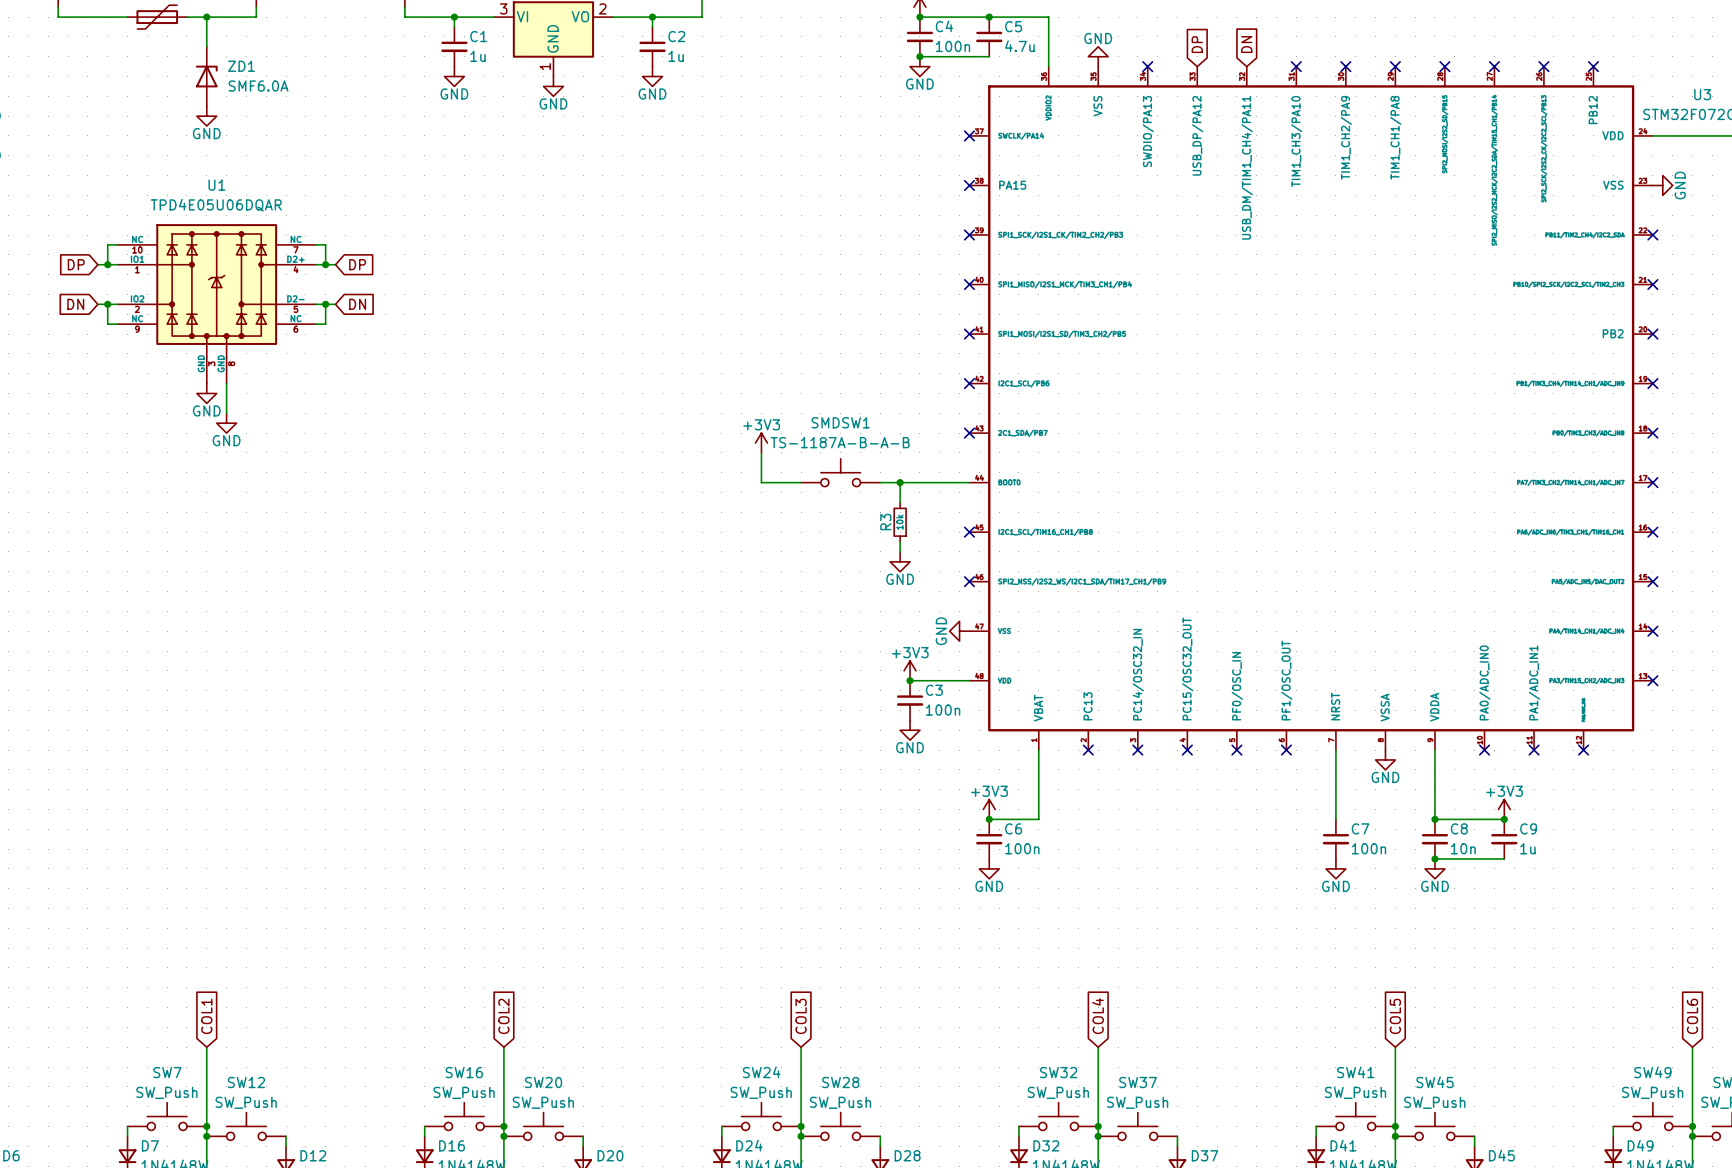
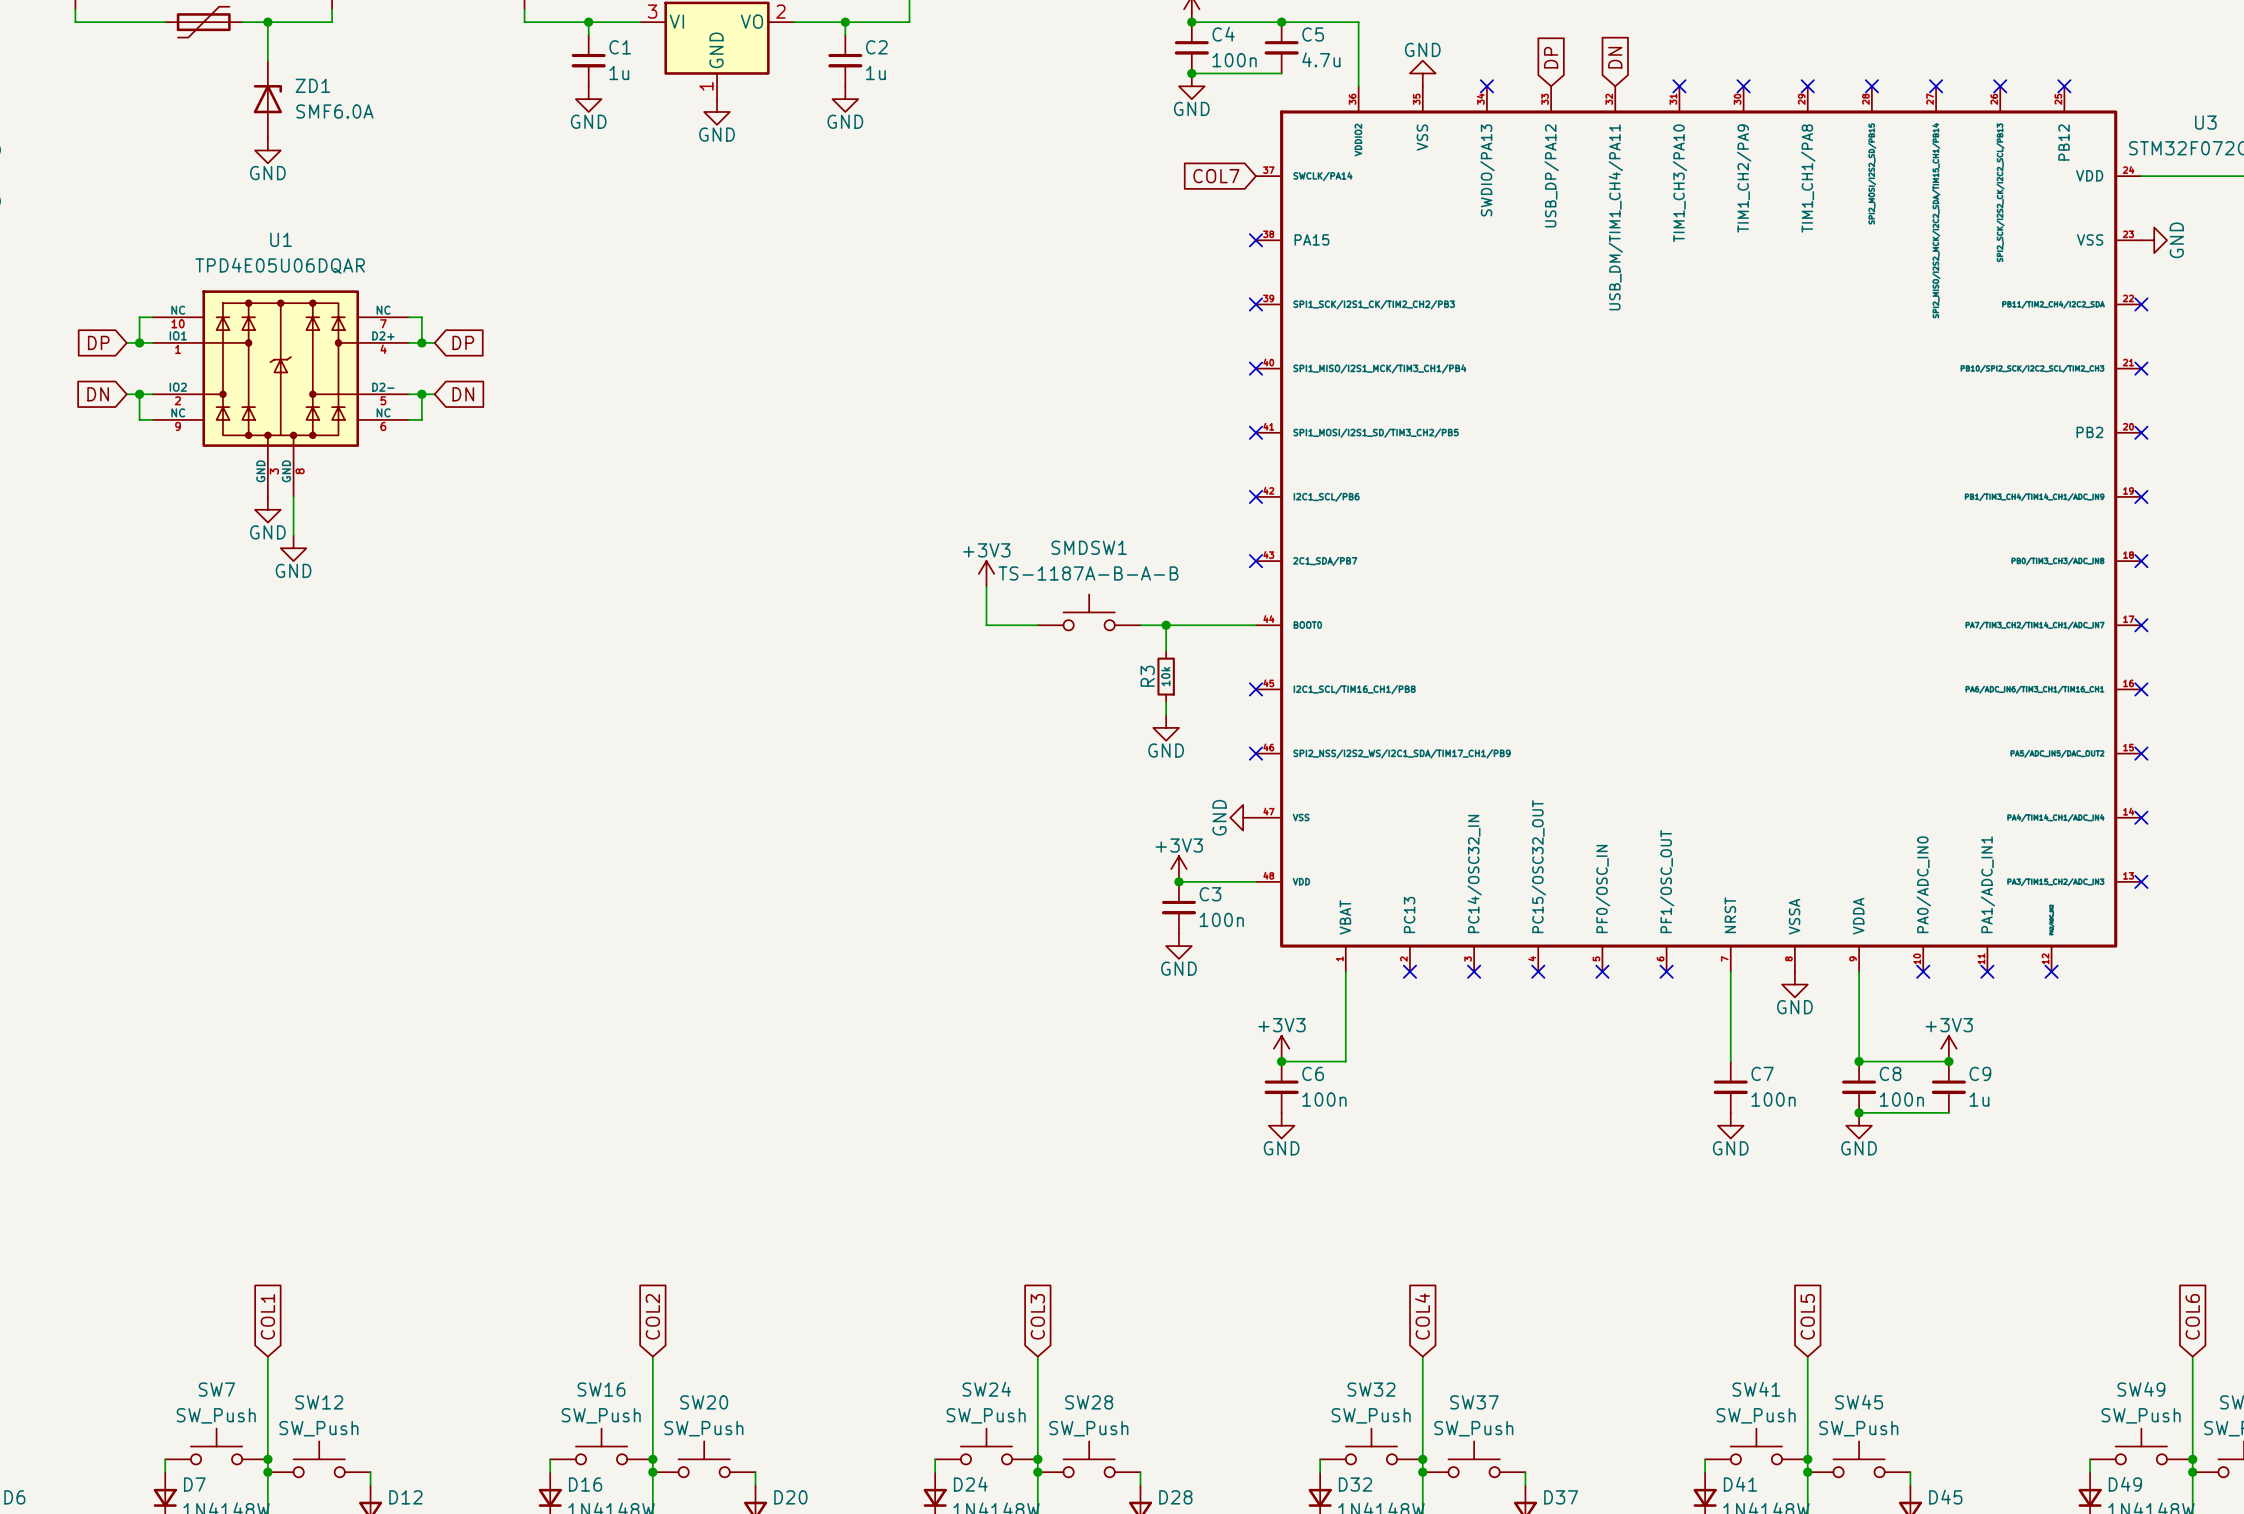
global label: none -> COL7 (1216, 176)
no-connect mark: (969, 135) -> none
C8 value: 10n (1463, 848) -> 100n (1901, 1099)

